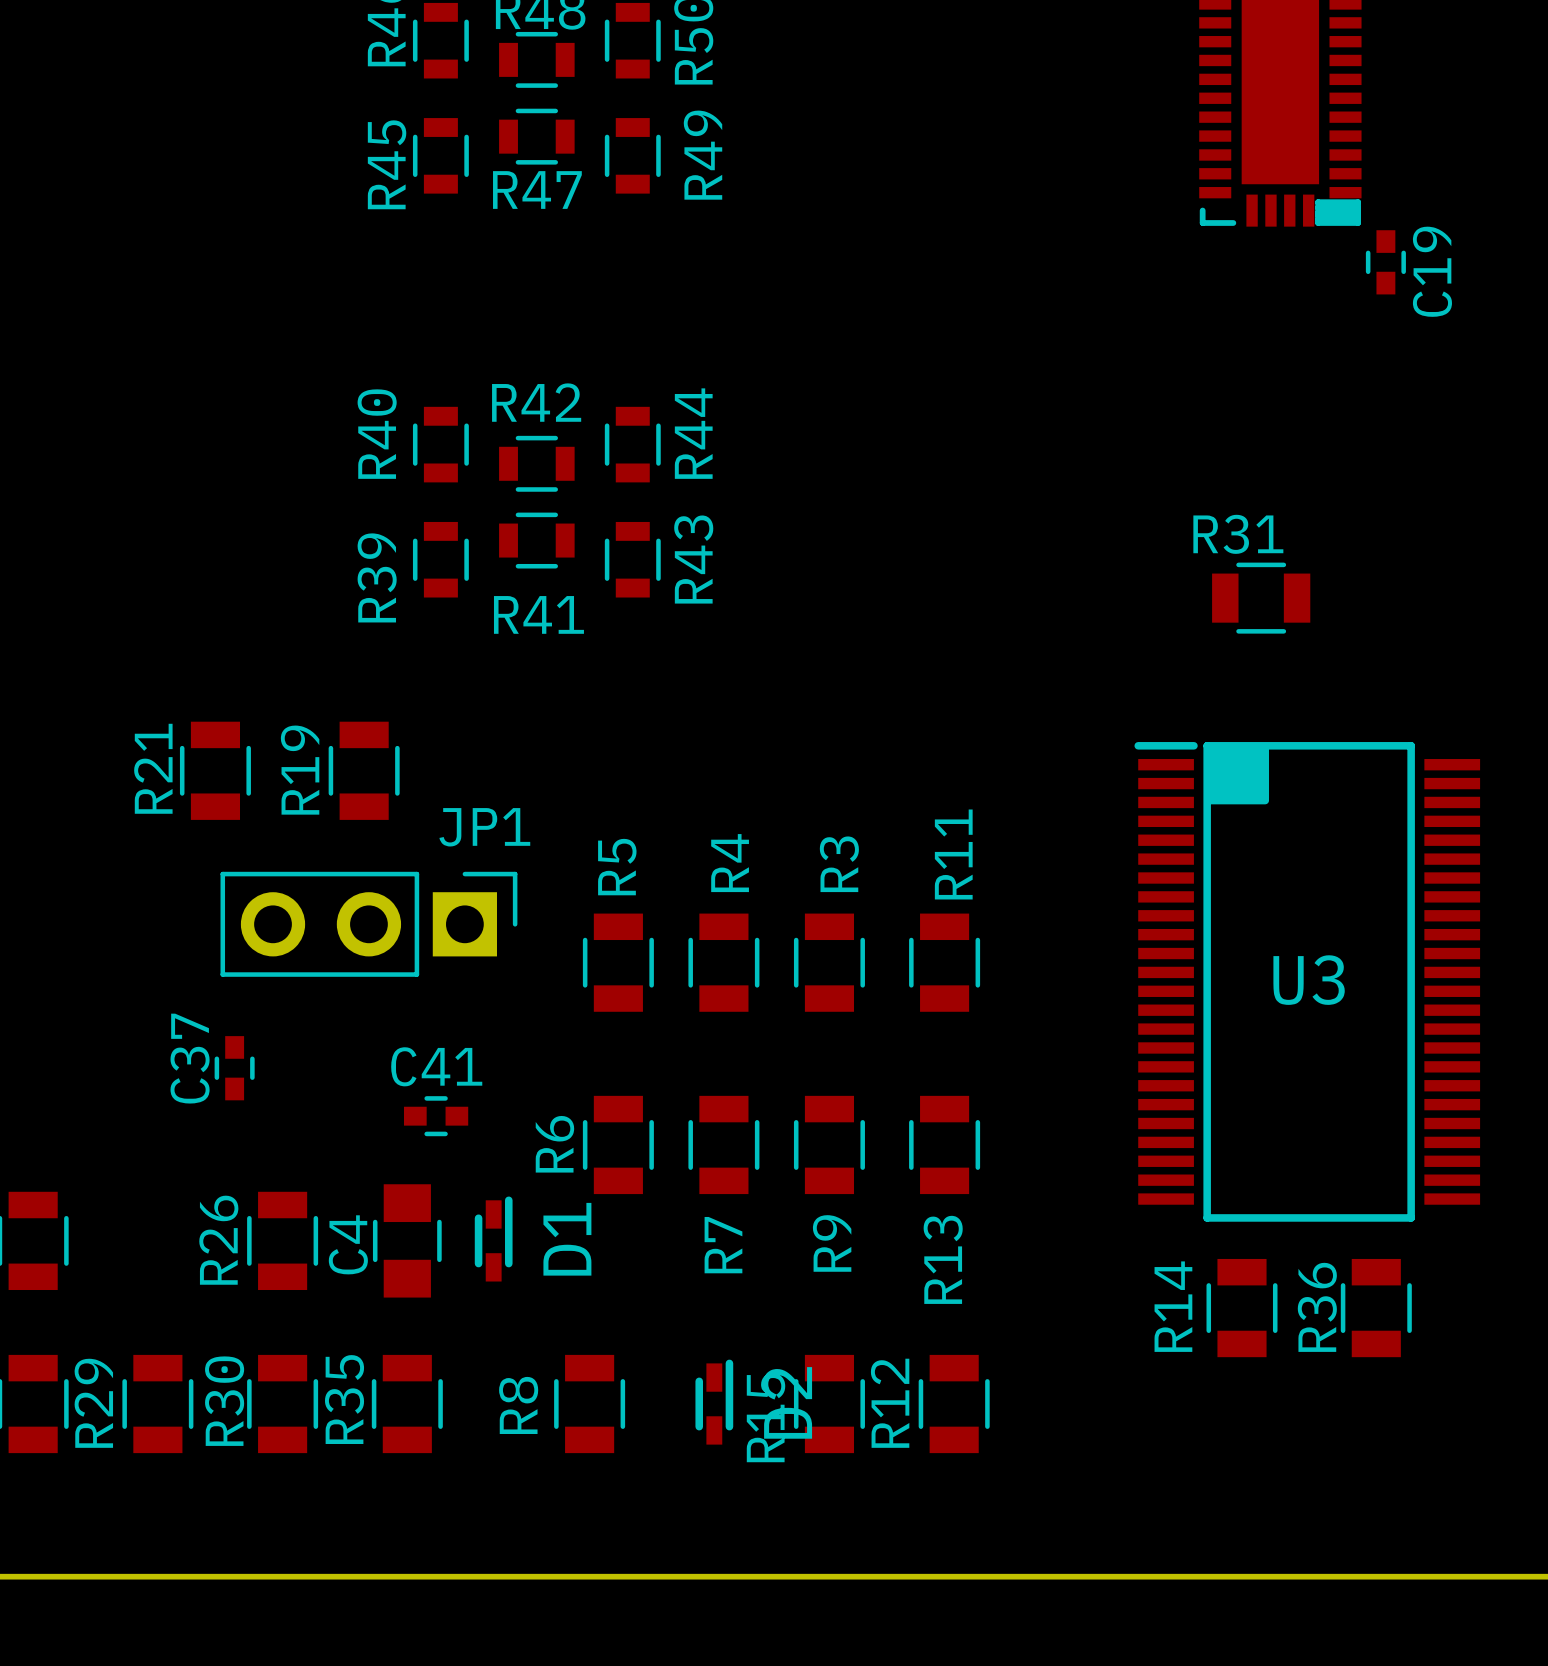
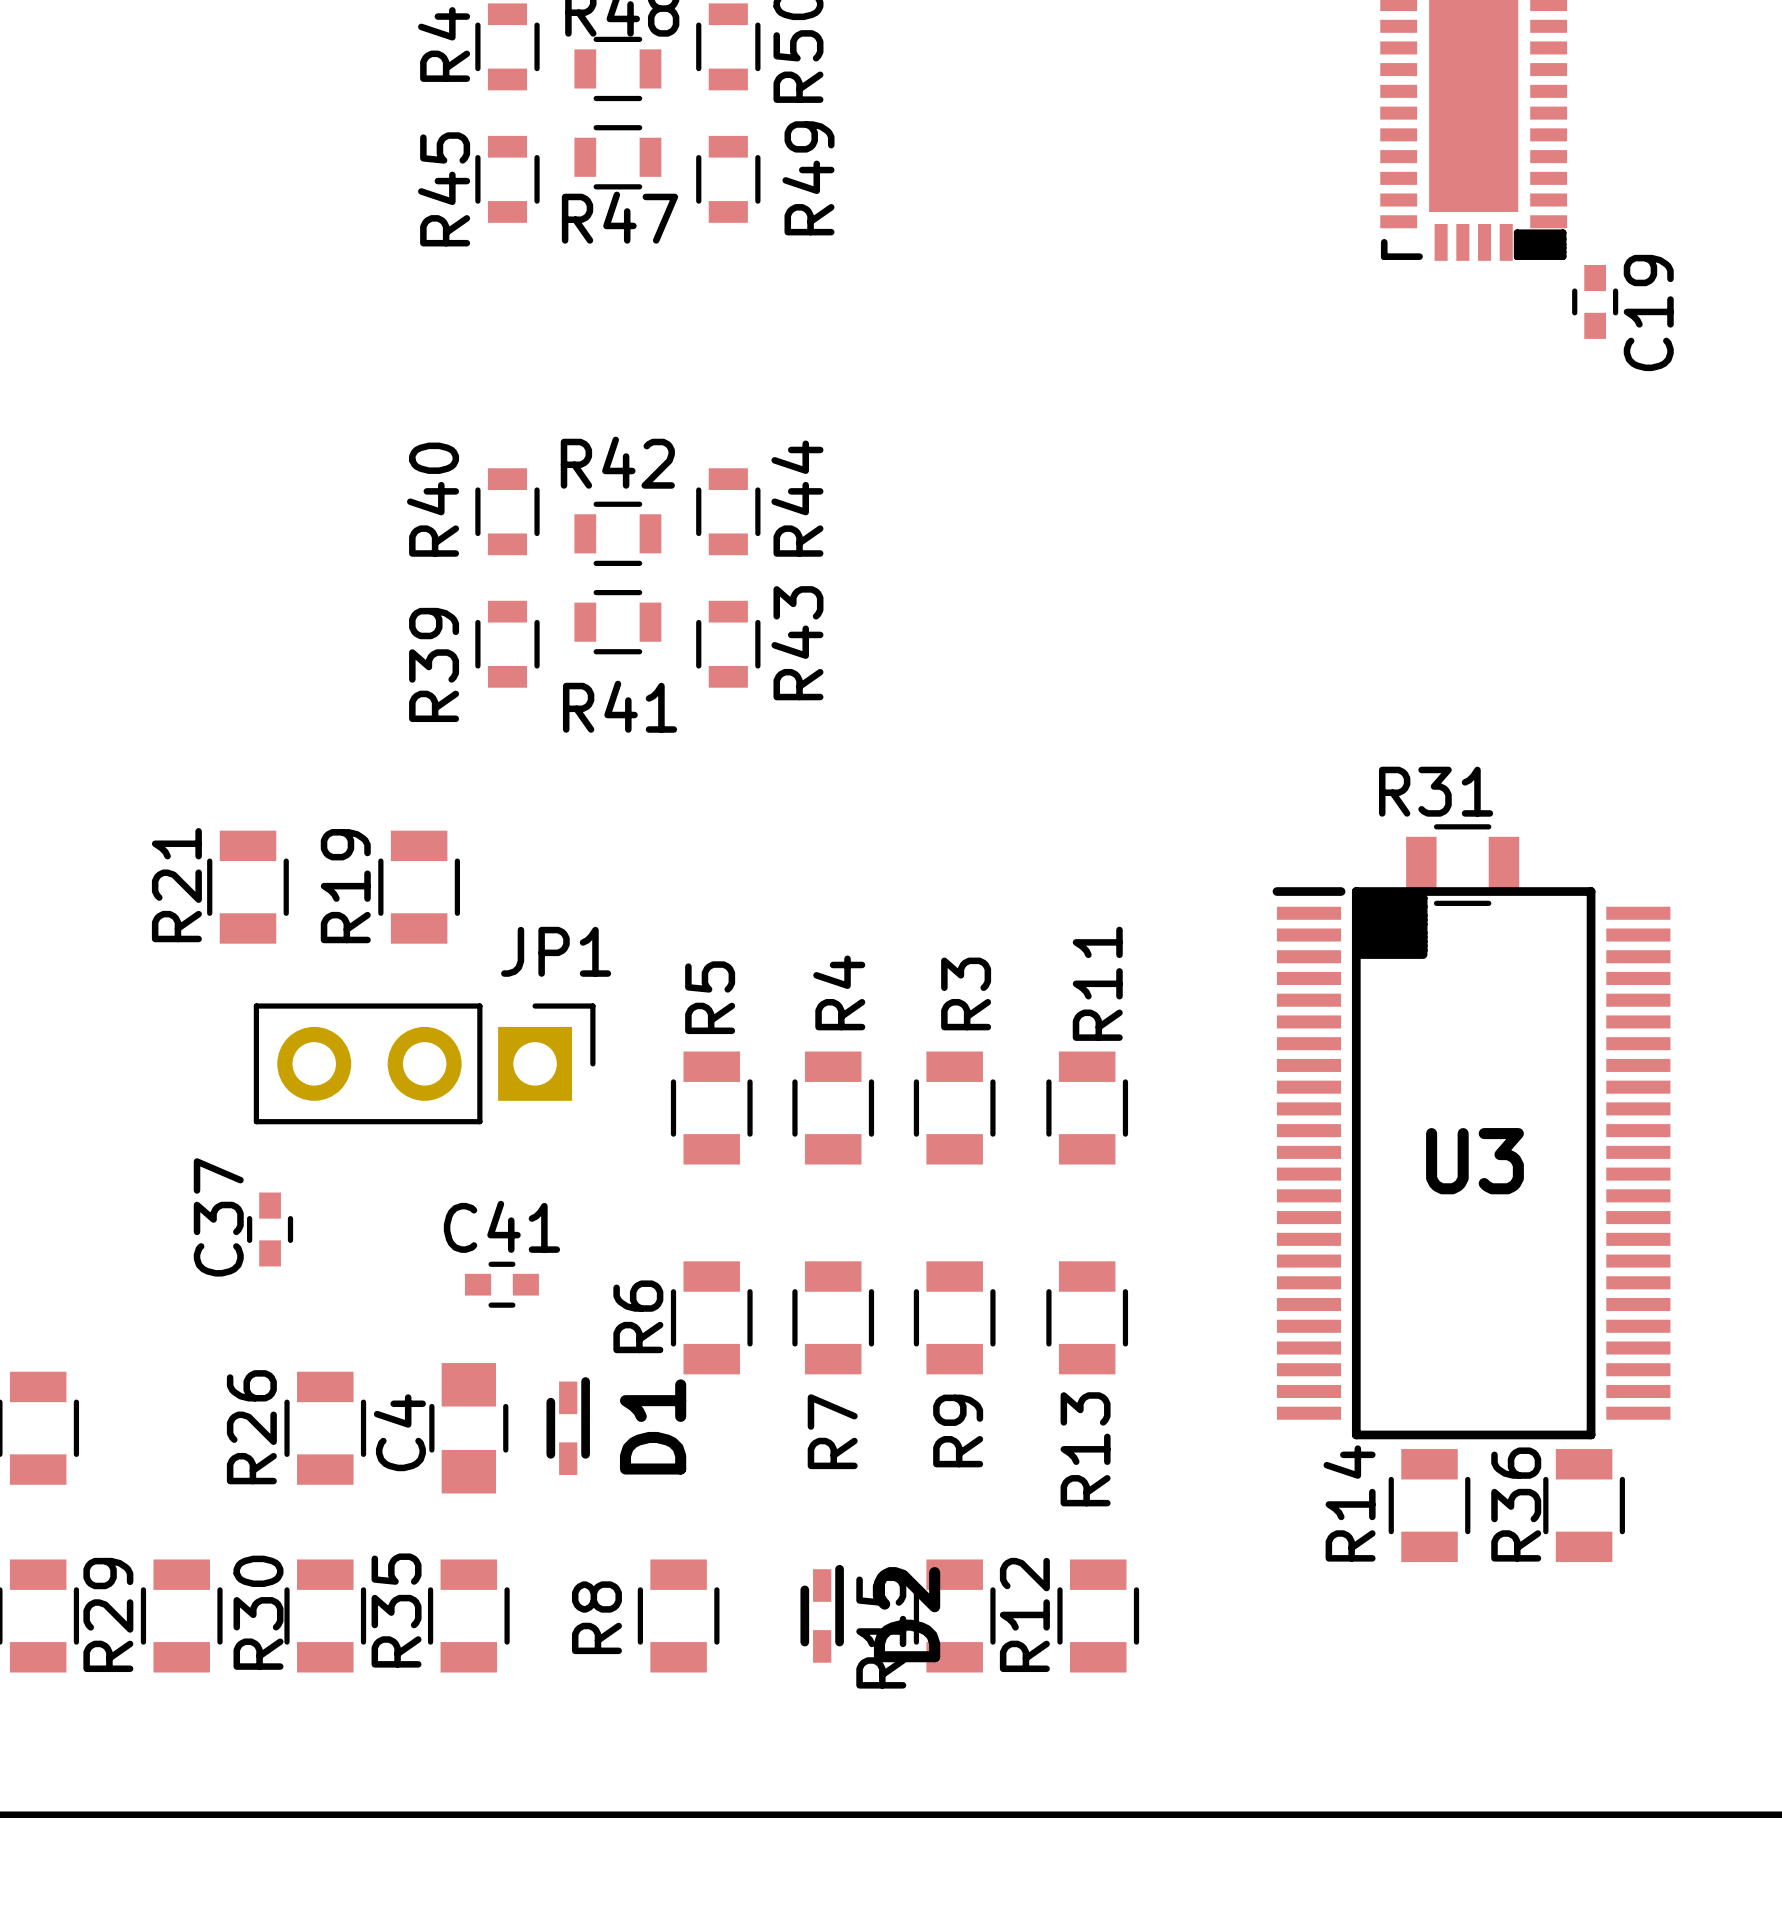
R31 position: (1261, 598) -> (1462, 865)
U3 position: (1307, 981) -> (1471, 1163)

